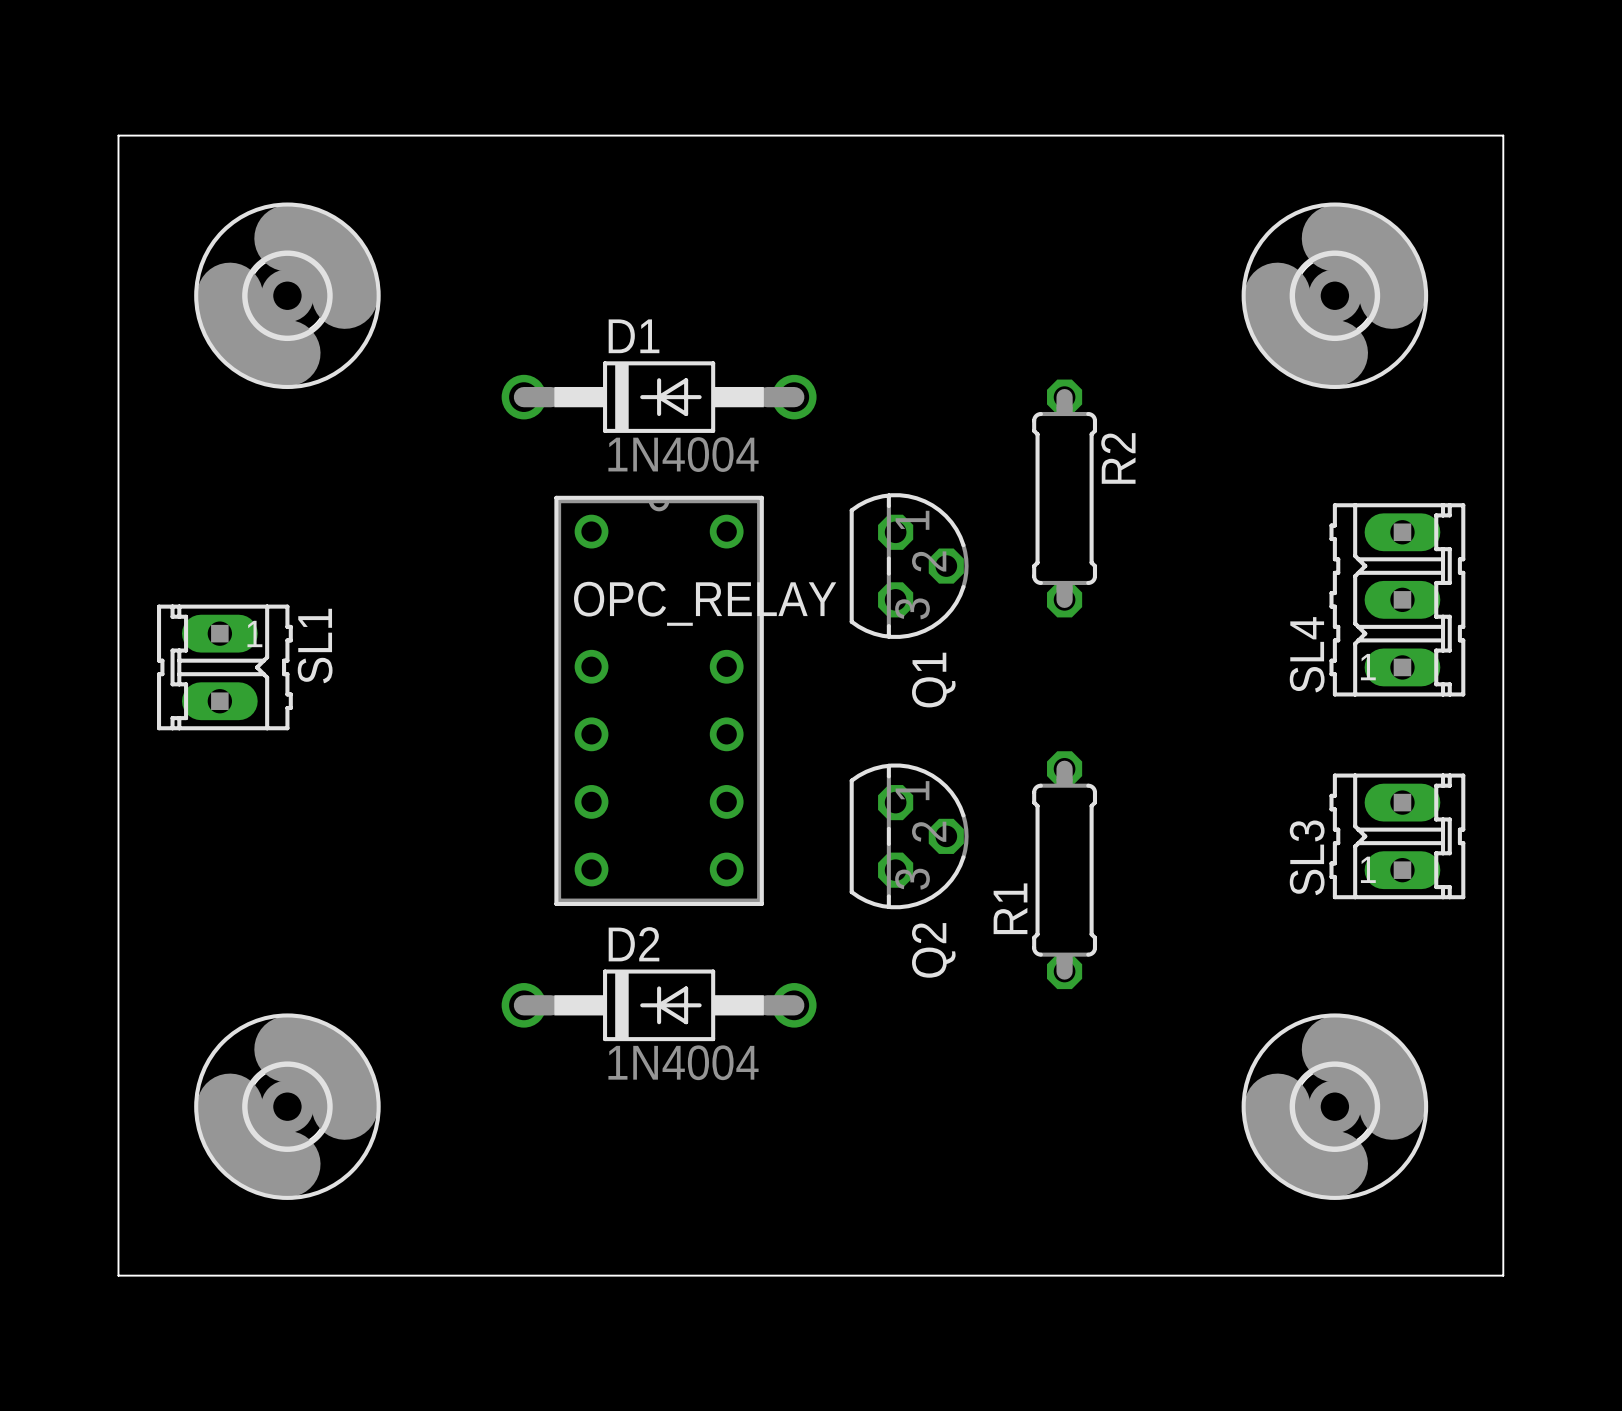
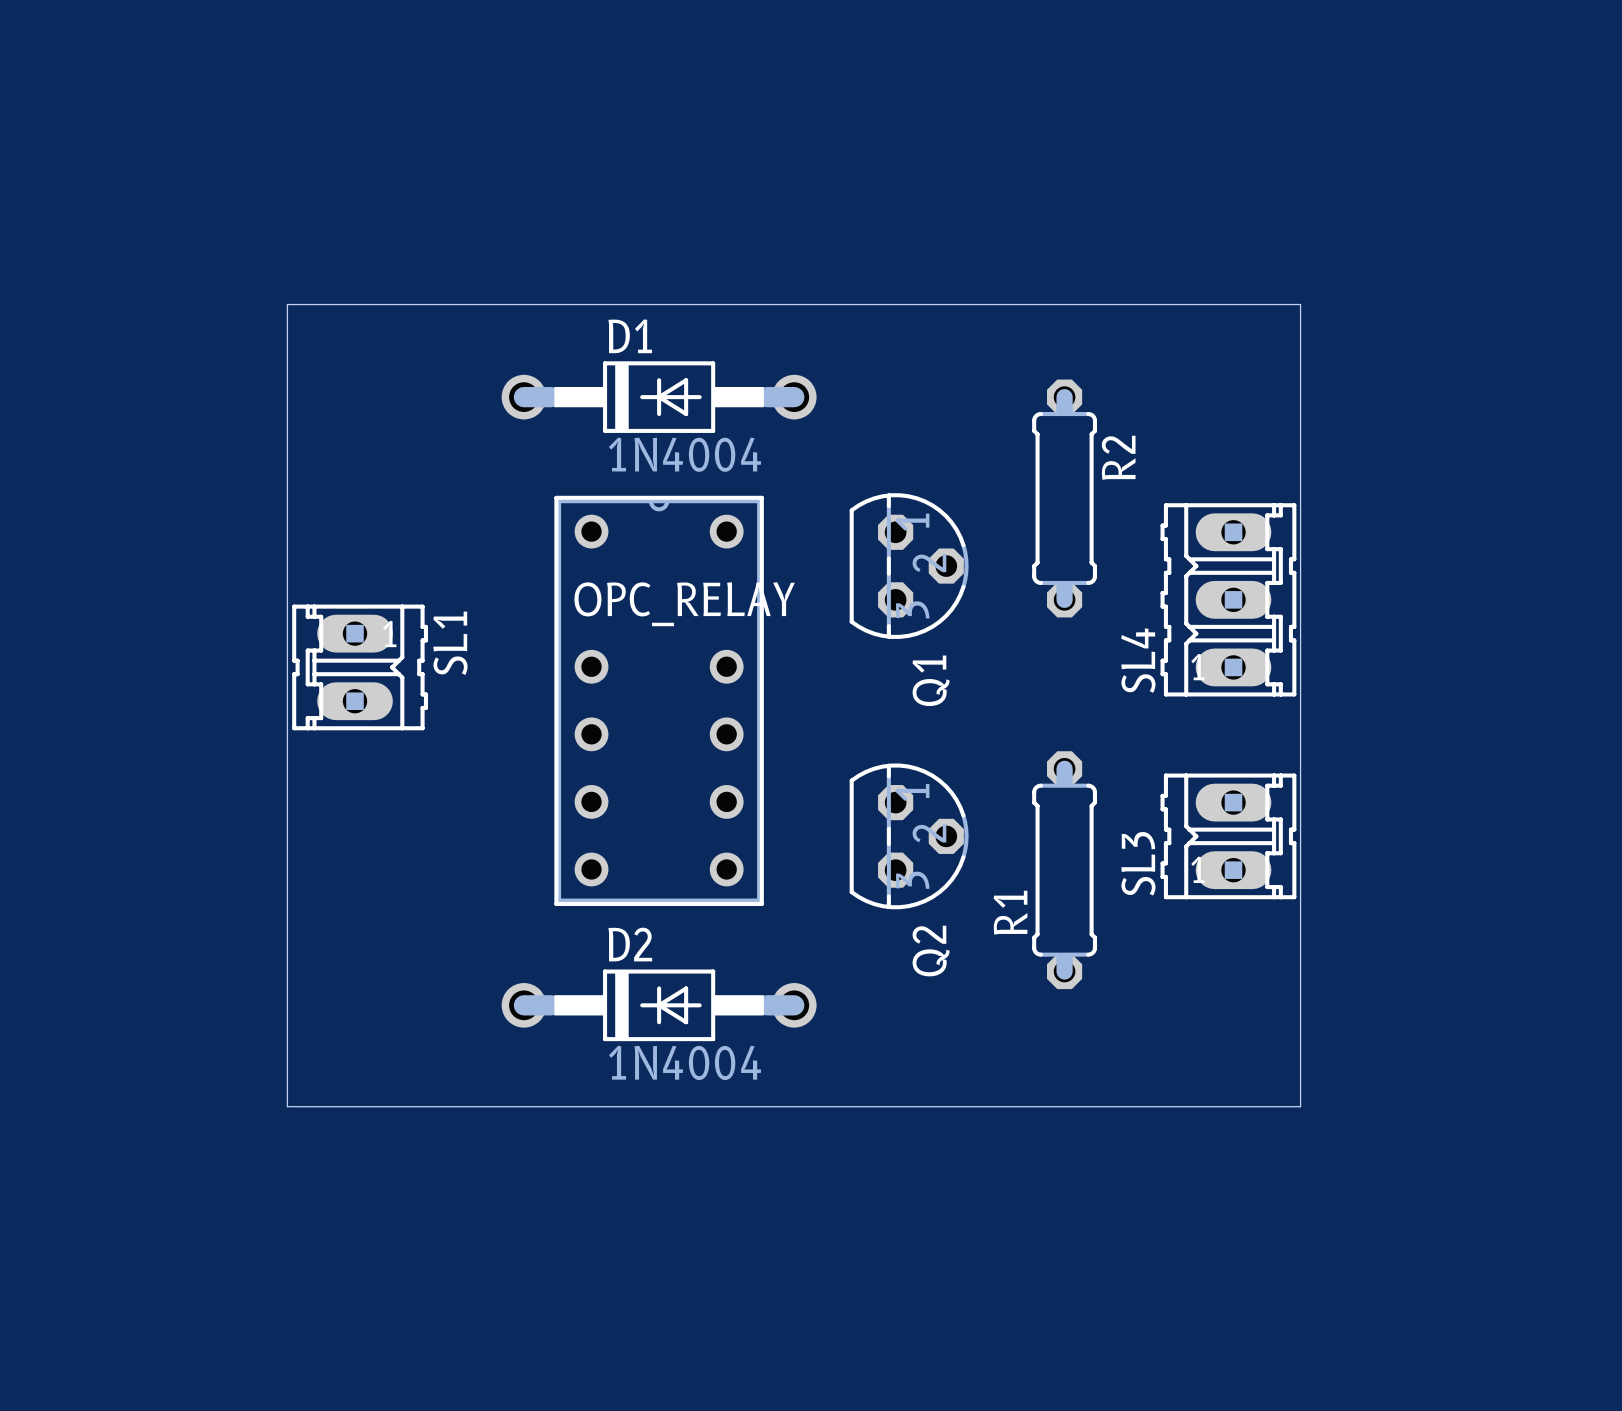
board edge: (118, 135) (1503, 135) (1503, 1275) (118, 1275) (118, 135) -> (287, 304) (287, 1106) (1300, 1106) (1300, 304) (287, 304)
part: (287, 295) -> none
part: (1334, 295) -> none
SL4 position: (1397, 599) -> (1228, 599)
SL1 position: (224, 667) -> (360, 667)
SL3 position: (1397, 836) -> (1228, 836)
part: (287, 1106) -> none
part: (1334, 1106) -> none

